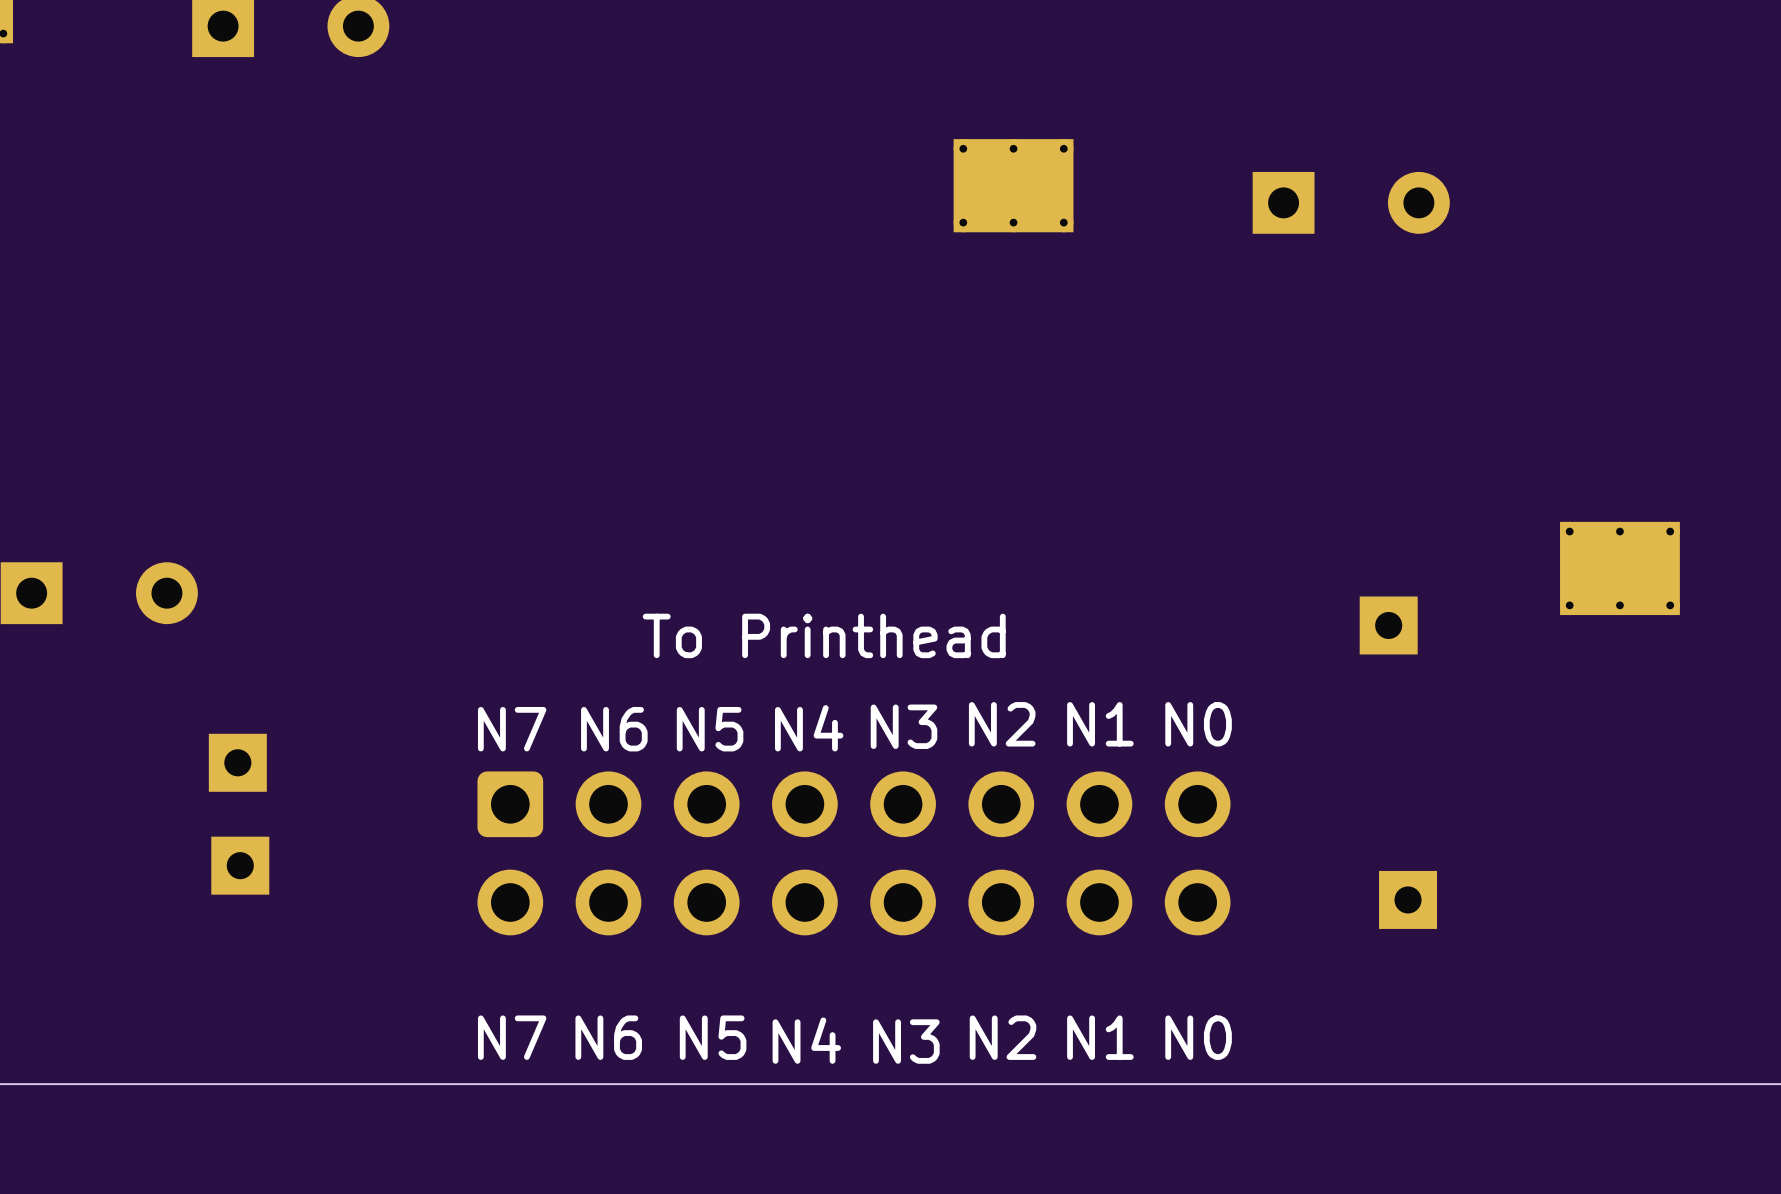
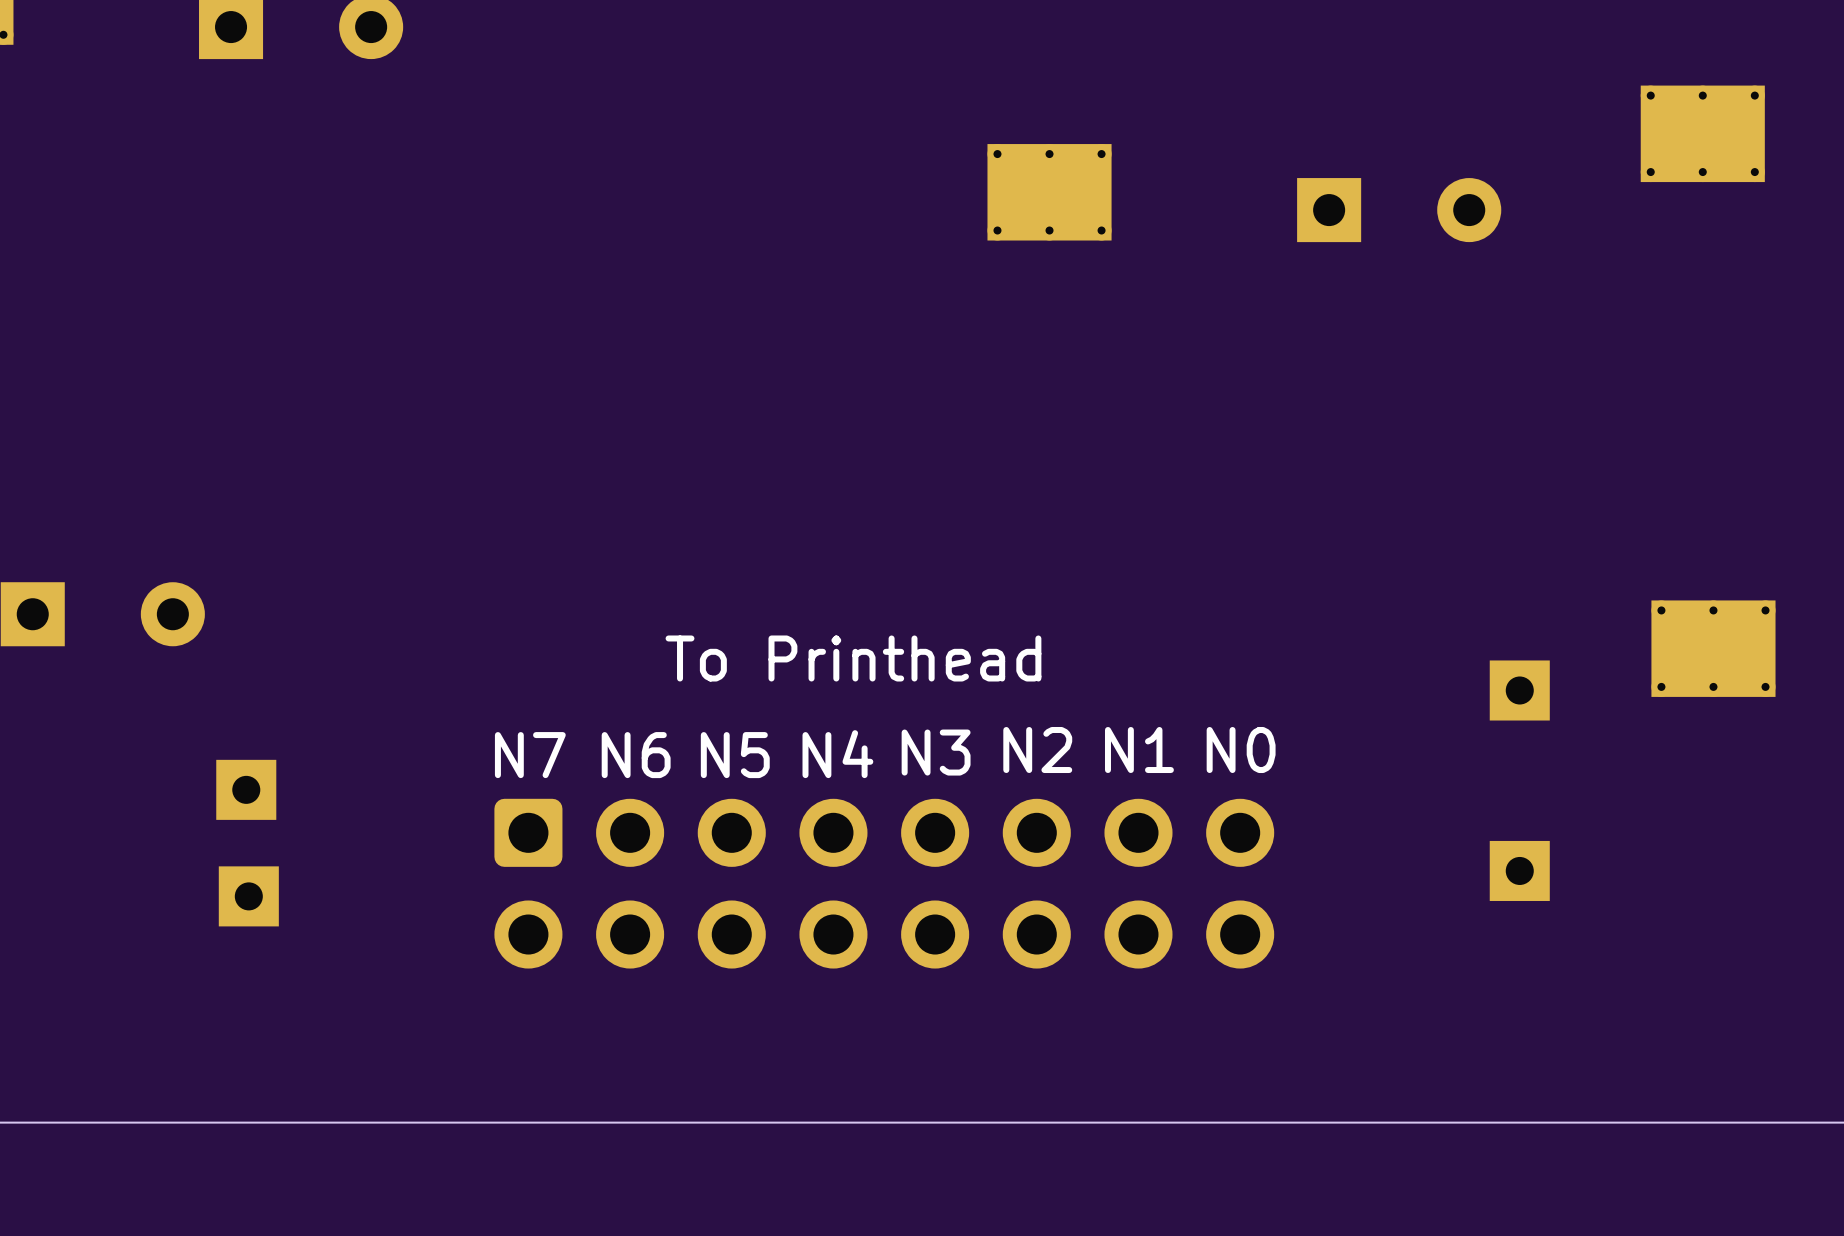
part: none -> (1702, 133)
part position: (1619, 568) -> (1713, 648)
part position: (1388, 625) -> (1519, 690)
part position: (1408, 899) -> (1519, 870)
text: N7 (512, 1037) -> none
text: N6 (608, 1037) -> none
text: N5 (713, 1037) -> none
text: N2 (1003, 1037) -> none
text: N1 (1100, 1037) -> none
text: N0 (1198, 1037) -> none
text: N4 (806, 1040) -> none
text: N3 (906, 1041) -> none

